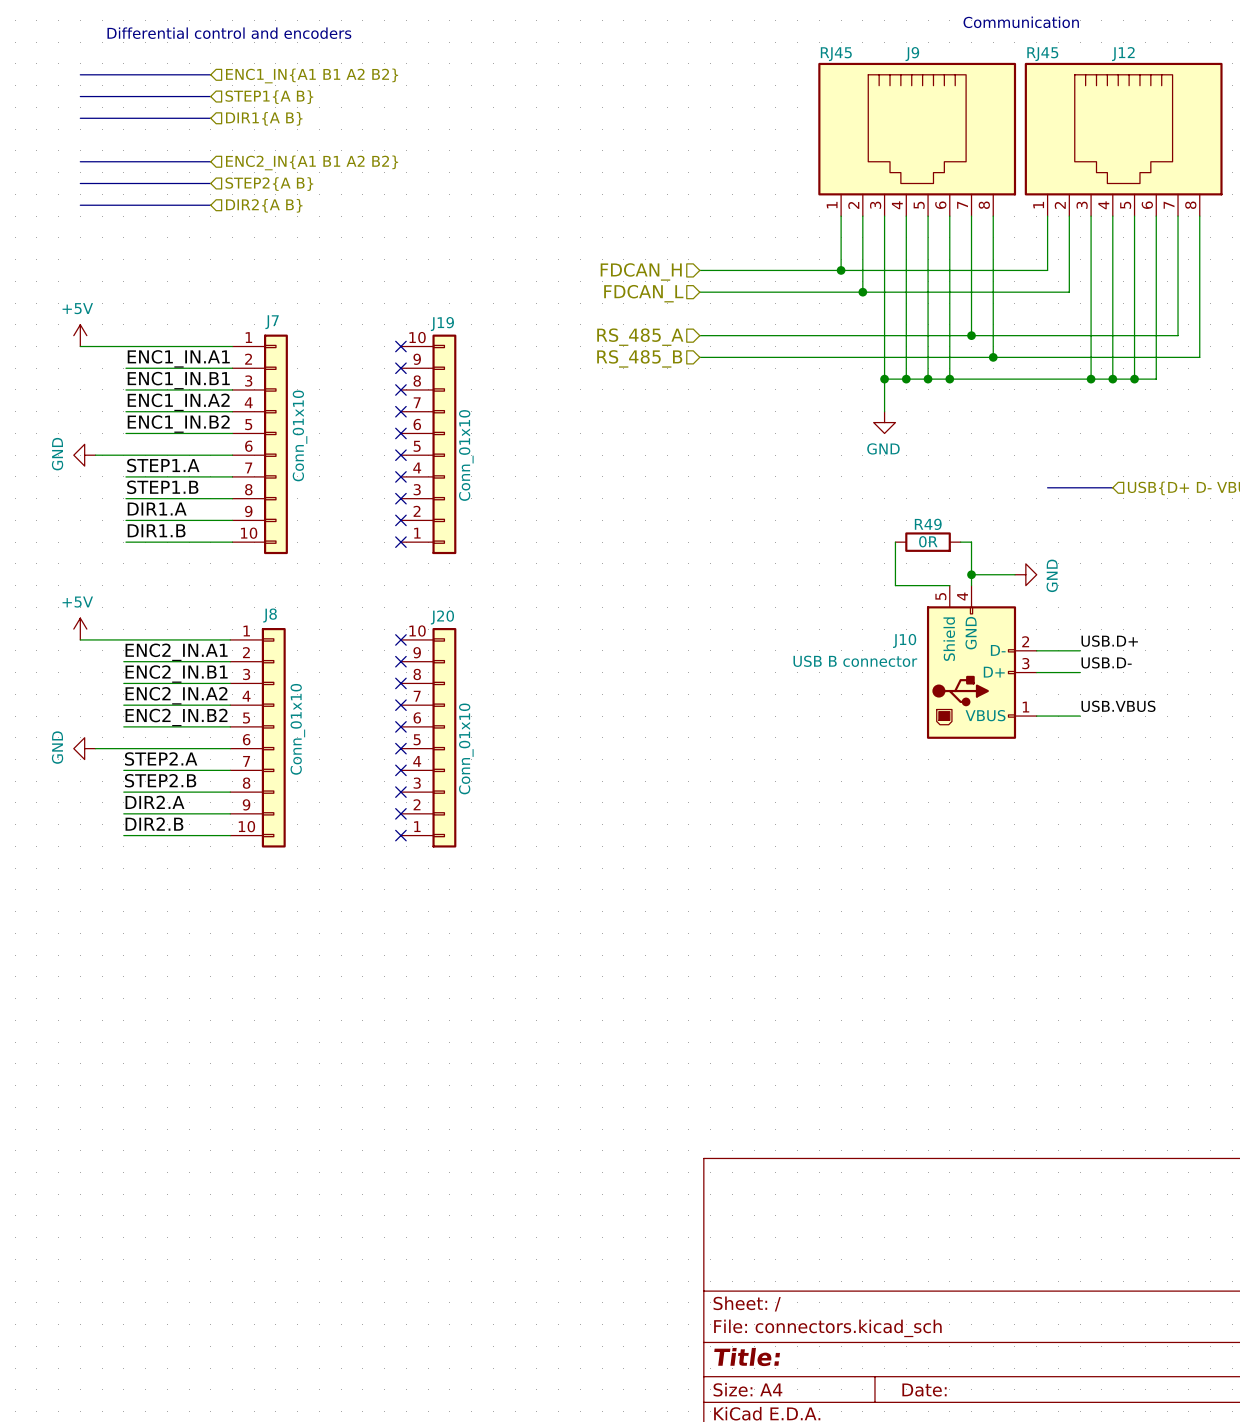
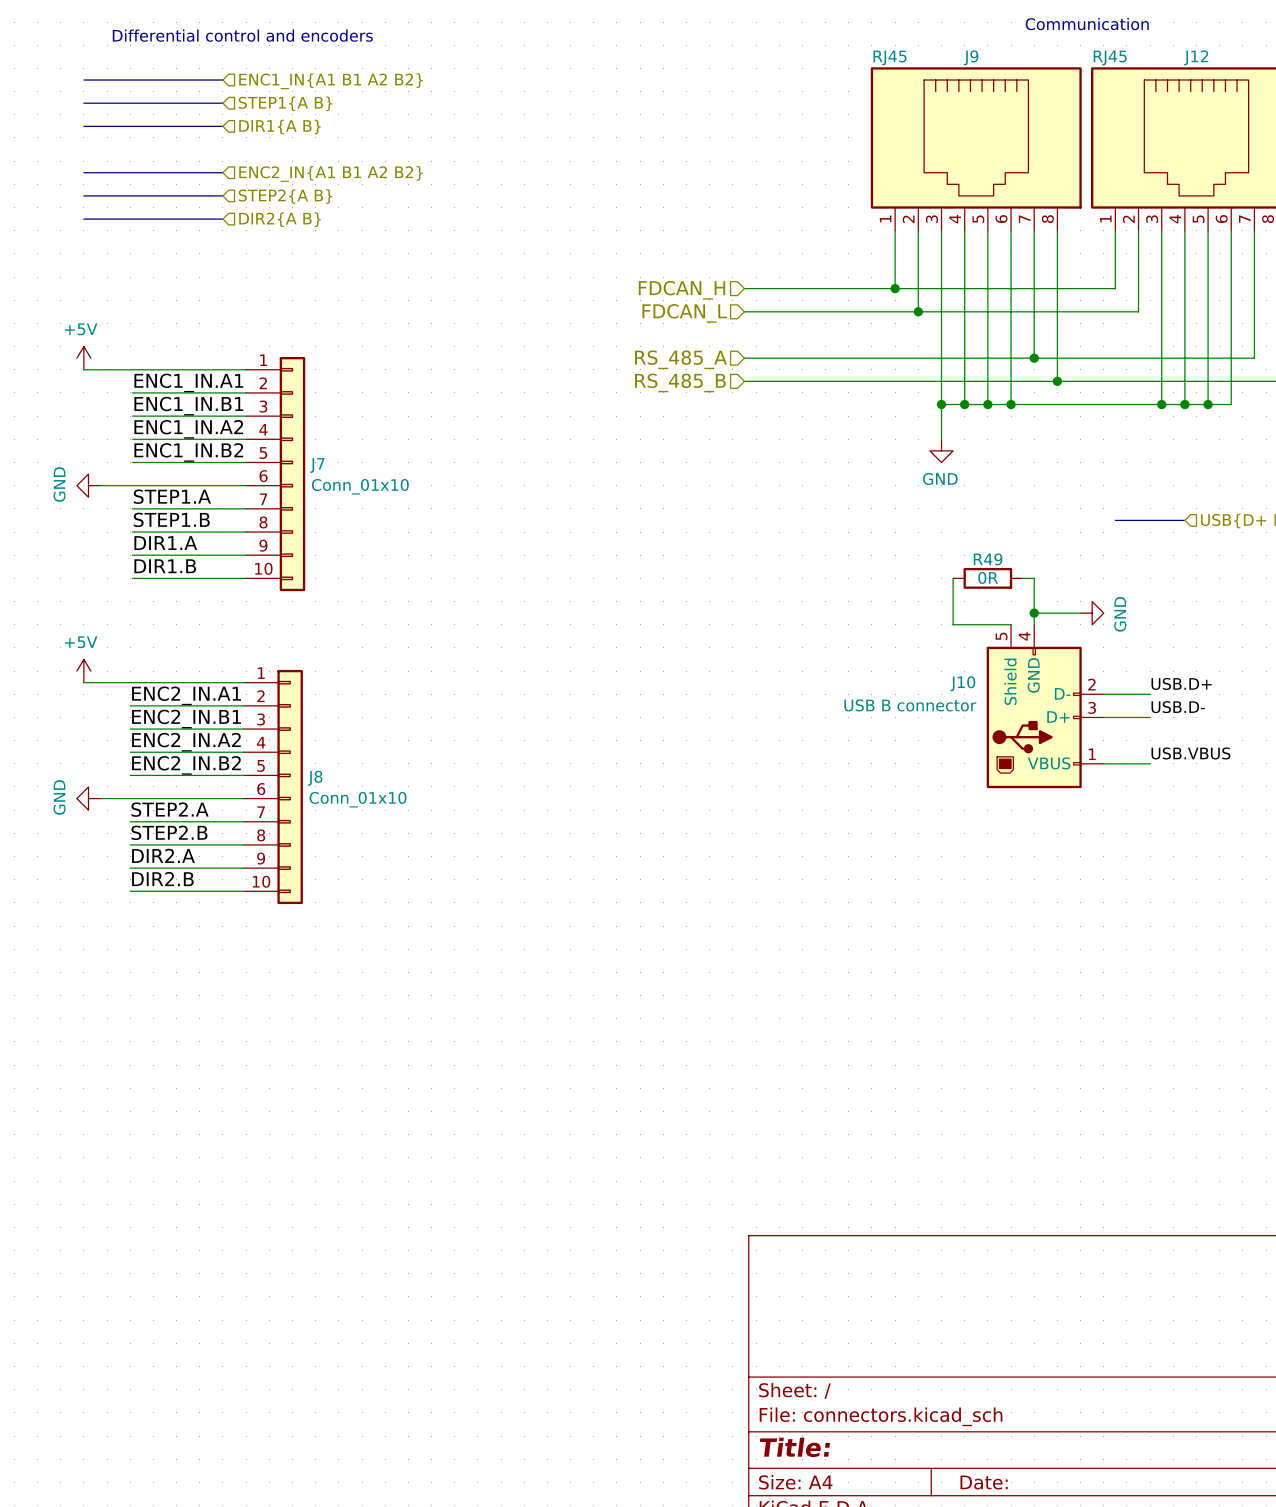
J7 name position: J7 (272, 322) -> J7 (317, 465)
no-connect mark: (400, 346) -> none
no-connect mark: (400, 368) -> none
no-connect mark: (400, 389) -> none
no-connect mark: (400, 411) -> none
no-connect mark: (400, 433) -> none
J7 value rotation: 0° (300, 435) -> 90° clockwise (360, 486)
J19: Conn_01x10 (428, 444) -> none
no-connect mark: (400, 455) -> none
no-connect mark: (400, 476) -> none
no-connect mark: (400, 498) -> none
no-connect mark: (400, 520) -> none
no-connect mark: (400, 542) -> none
J8 name position: J8 (270, 615) -> J8 (315, 778)
no-connect mark: (400, 639) -> none
no-connect mark: (400, 661) -> none
no-connect mark: (400, 683) -> none
no-connect mark: (400, 705) -> none
no-connect mark: (400, 726) -> none
J8 value rotation: 0° (297, 729) -> 90° clockwise (358, 799)
J20: Conn_01x10 (428, 737) -> none
no-connect mark: (400, 748) -> none
no-connect mark: (400, 770) -> none
no-connect mark: (400, 792) -> none
no-connect mark: (400, 813) -> none
no-connect mark: (400, 835) -> none

